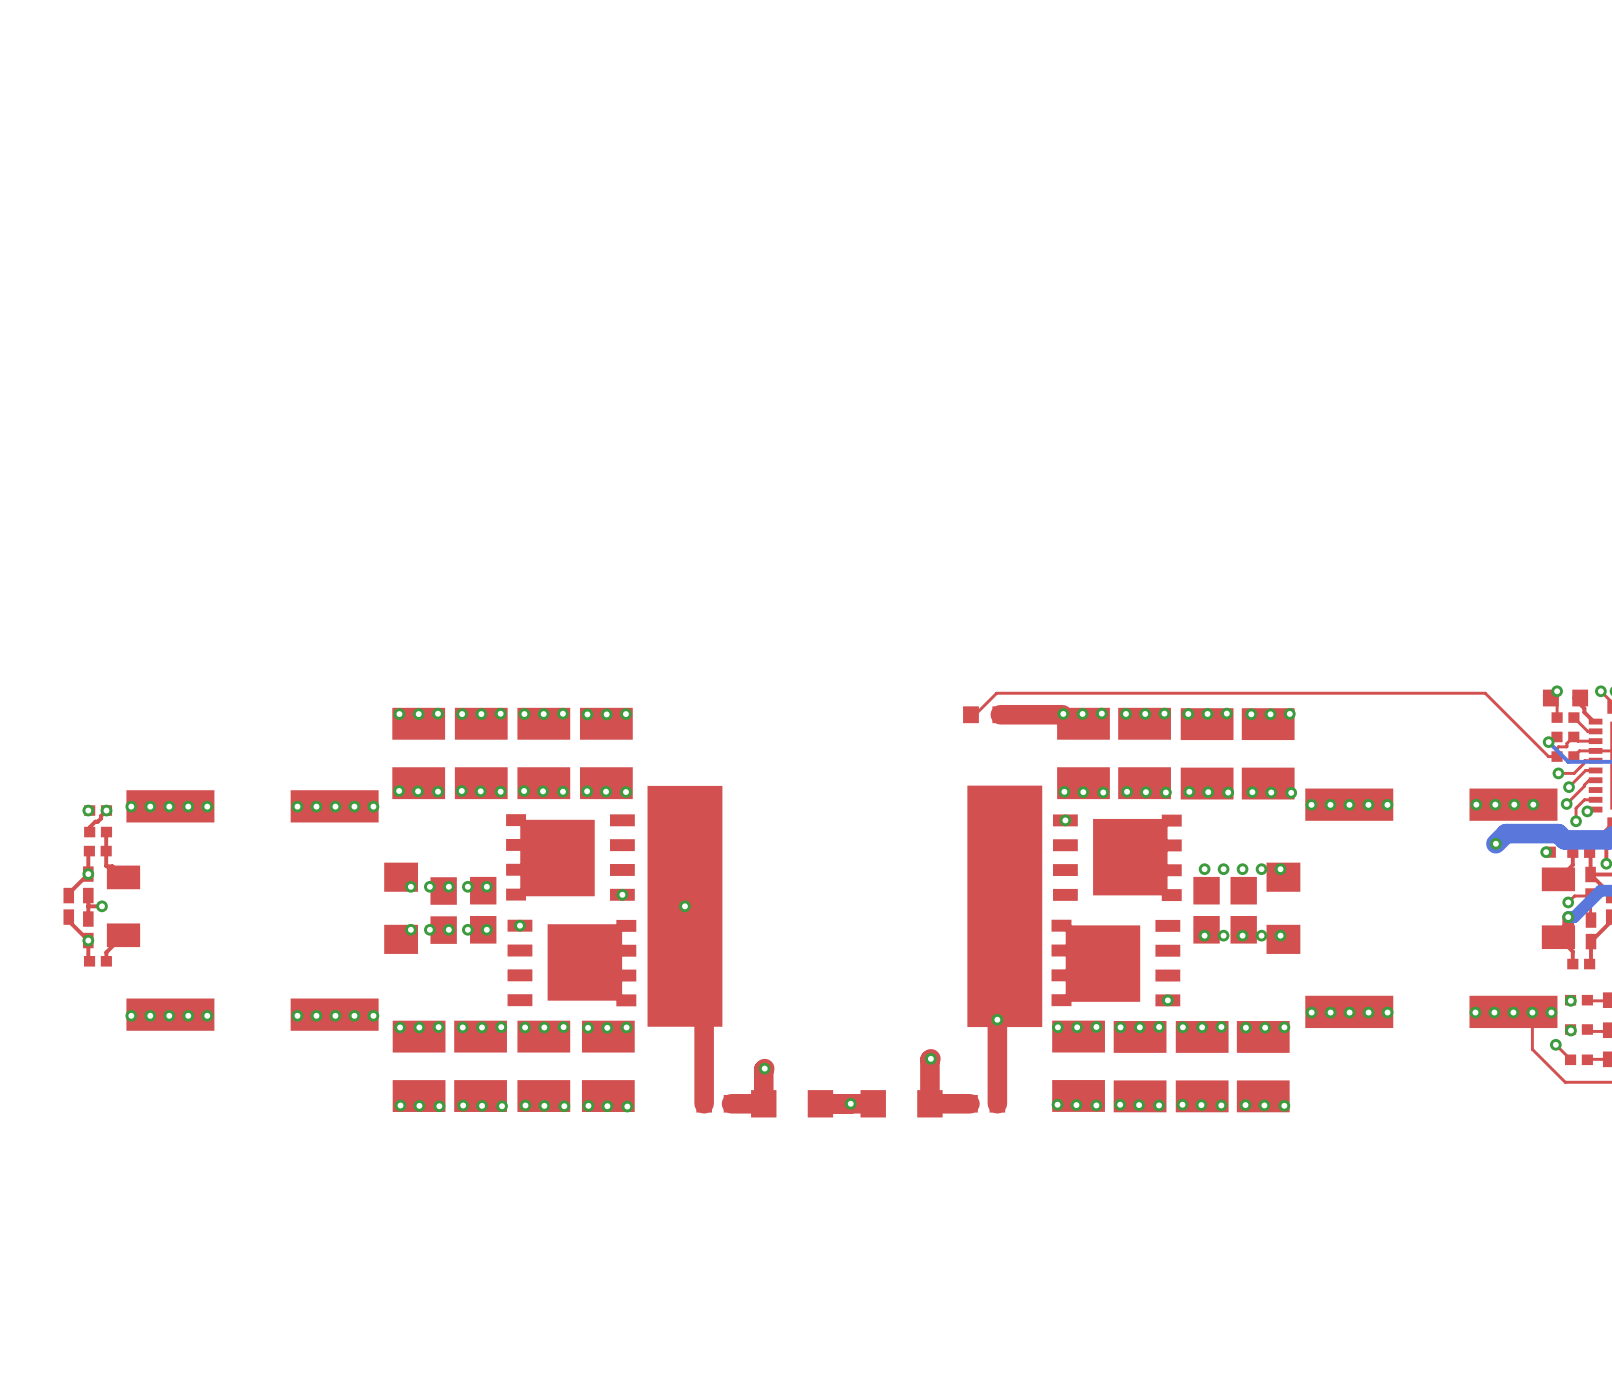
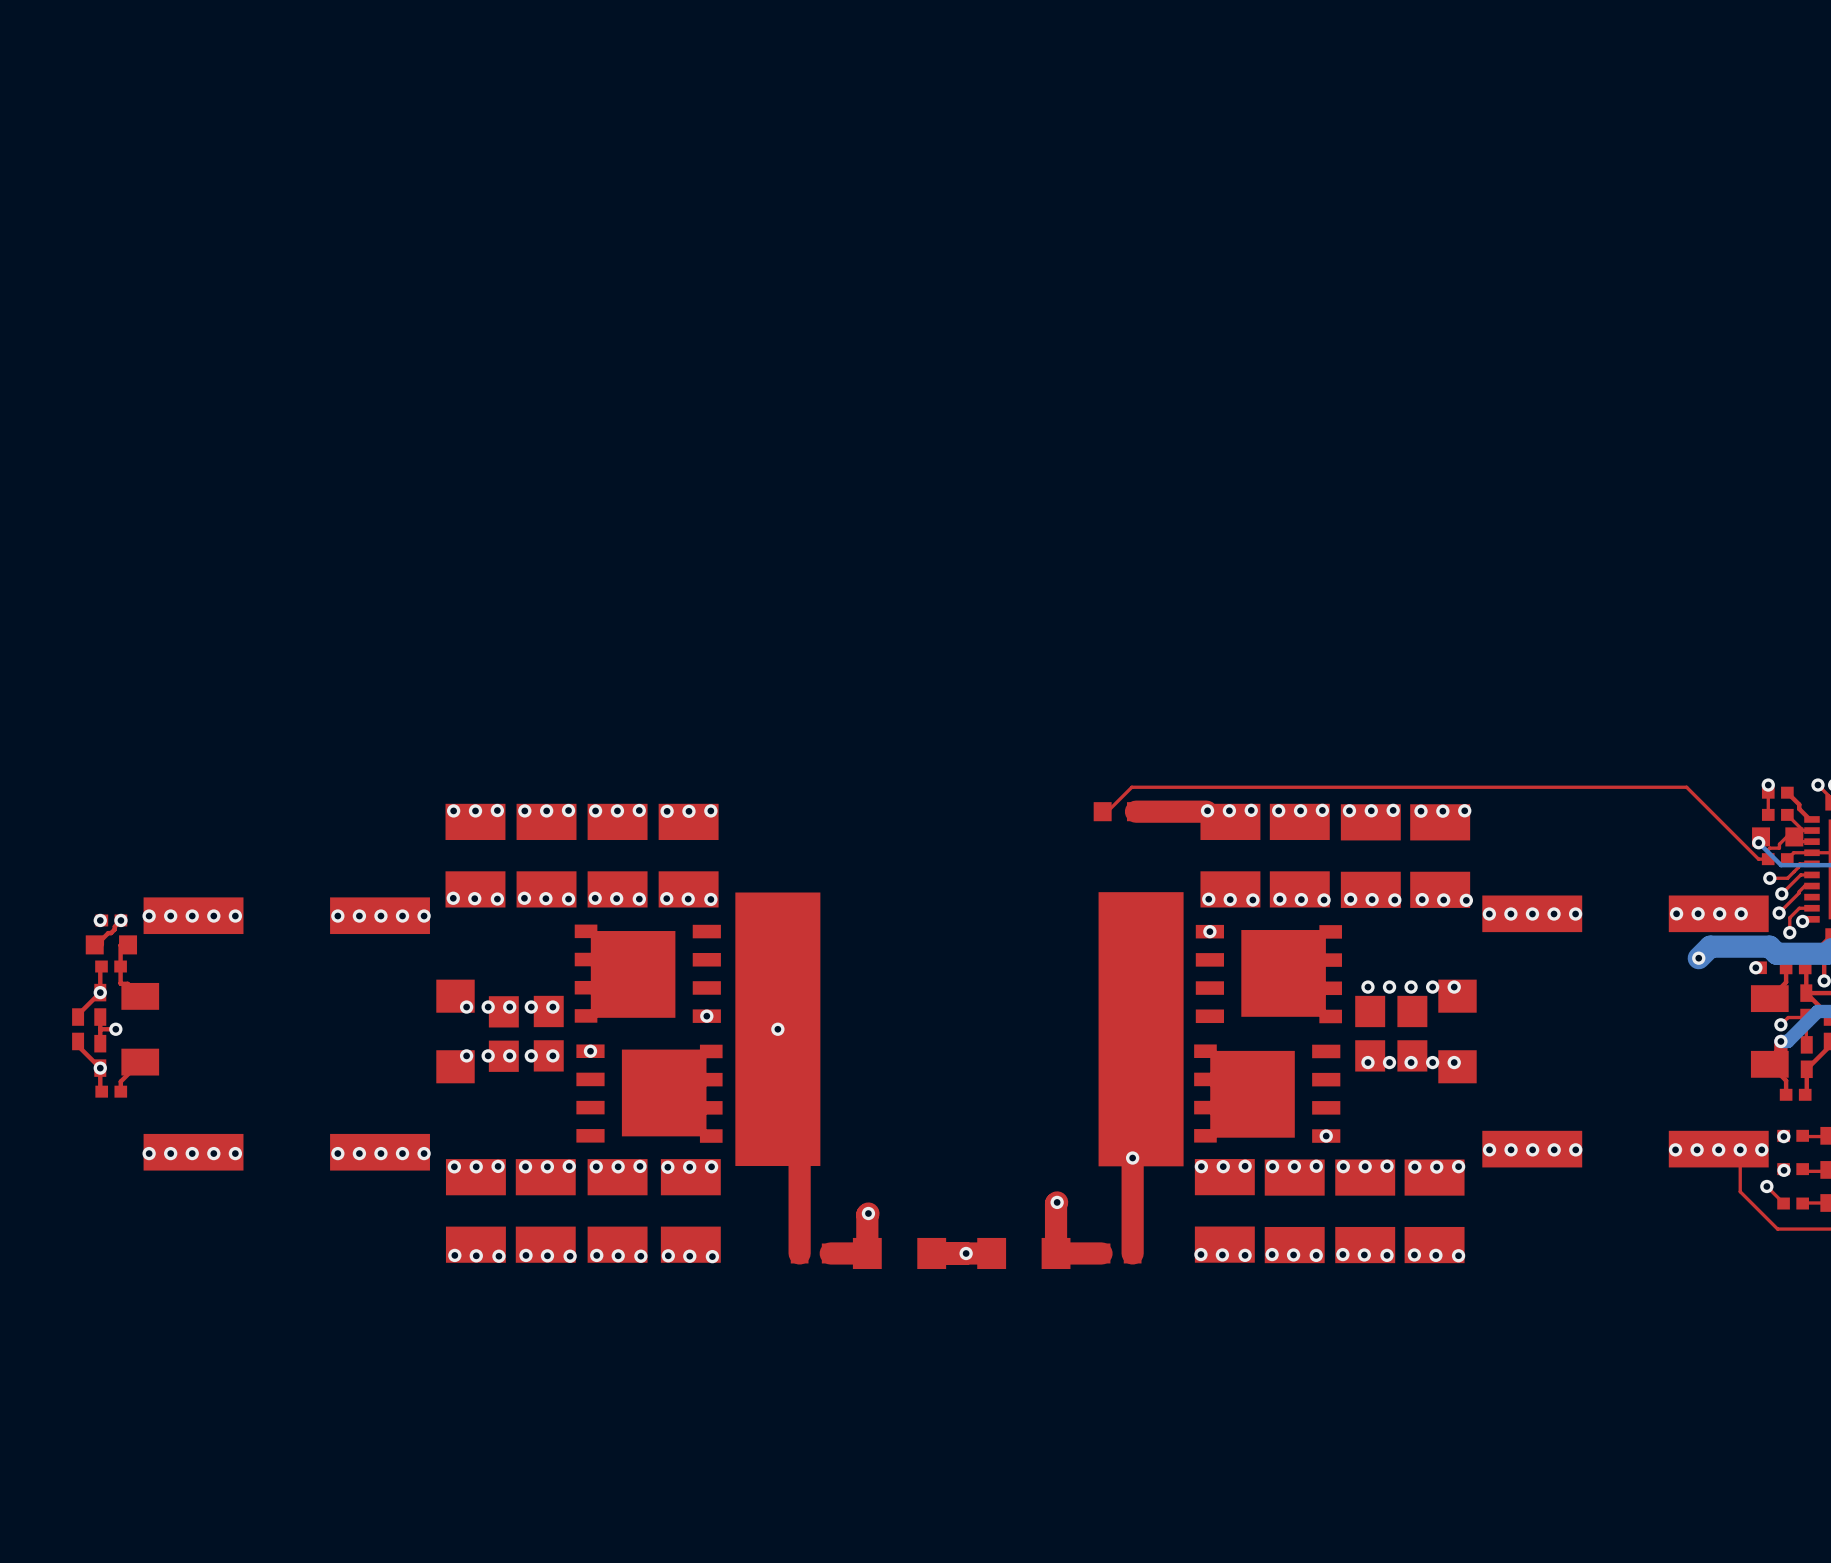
part footprint: [1542, 689, 1589, 707] -> [1761, 786, 1794, 799]
part footprint: [1551, 731, 1580, 743] -> [1752, 827, 1804, 847]
part footprint: [84, 826, 113, 838] -> [85, 935, 138, 955]

